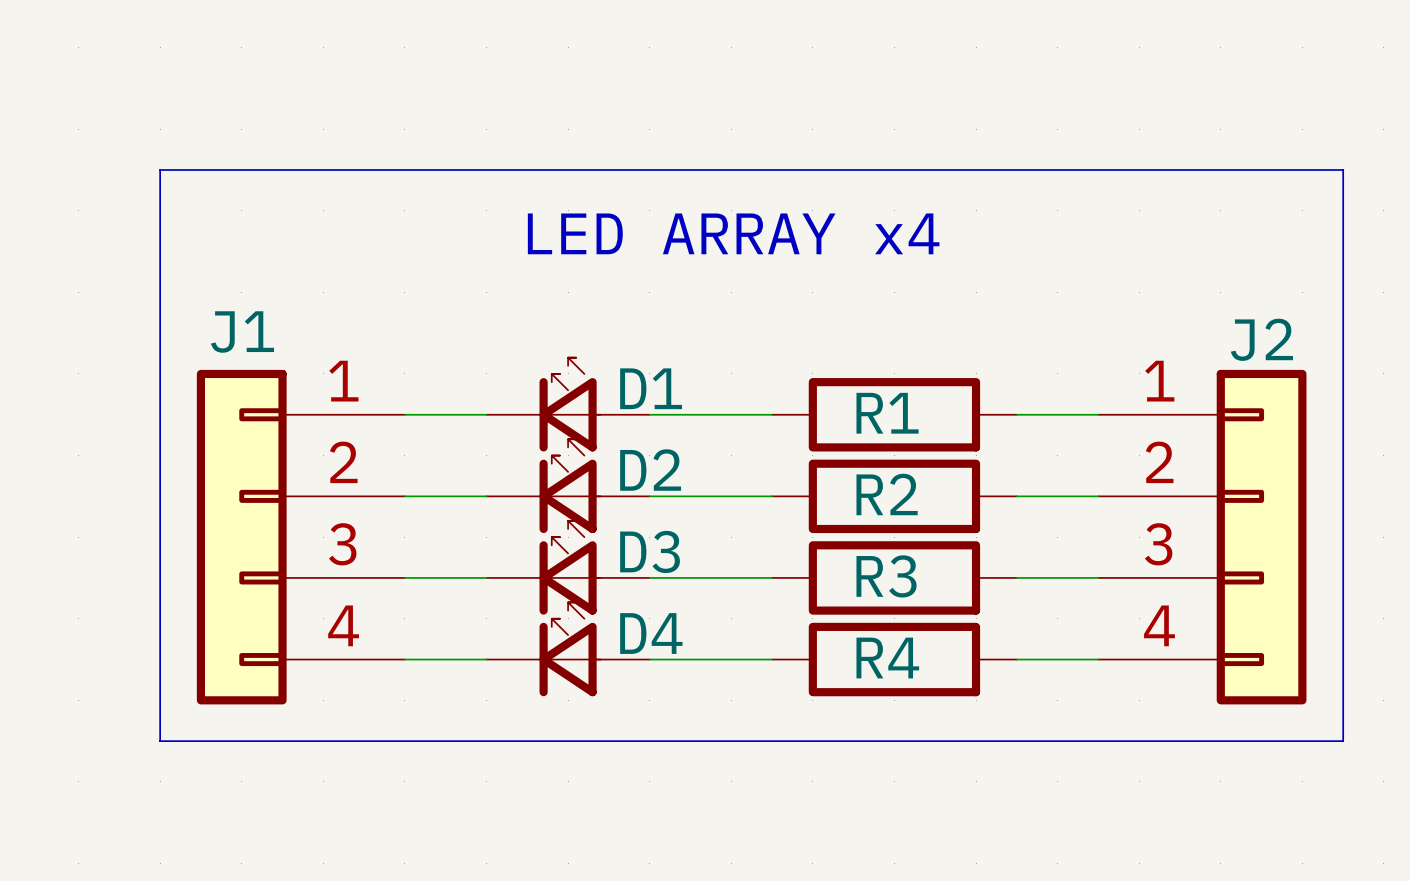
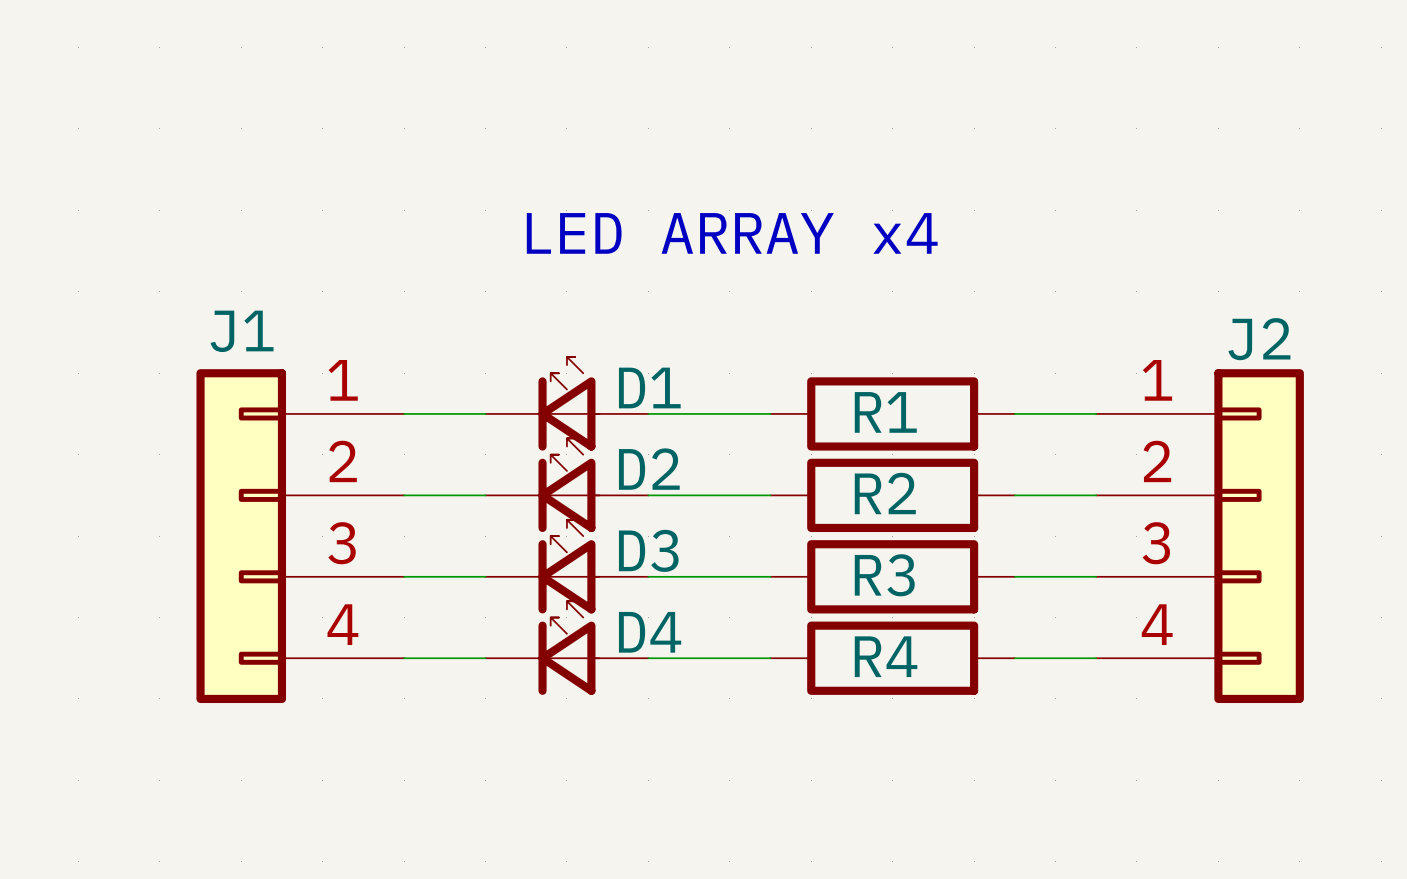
line: (160, 170) (1343, 170) (1343, 741) (160, 741) (160, 170) -> none

